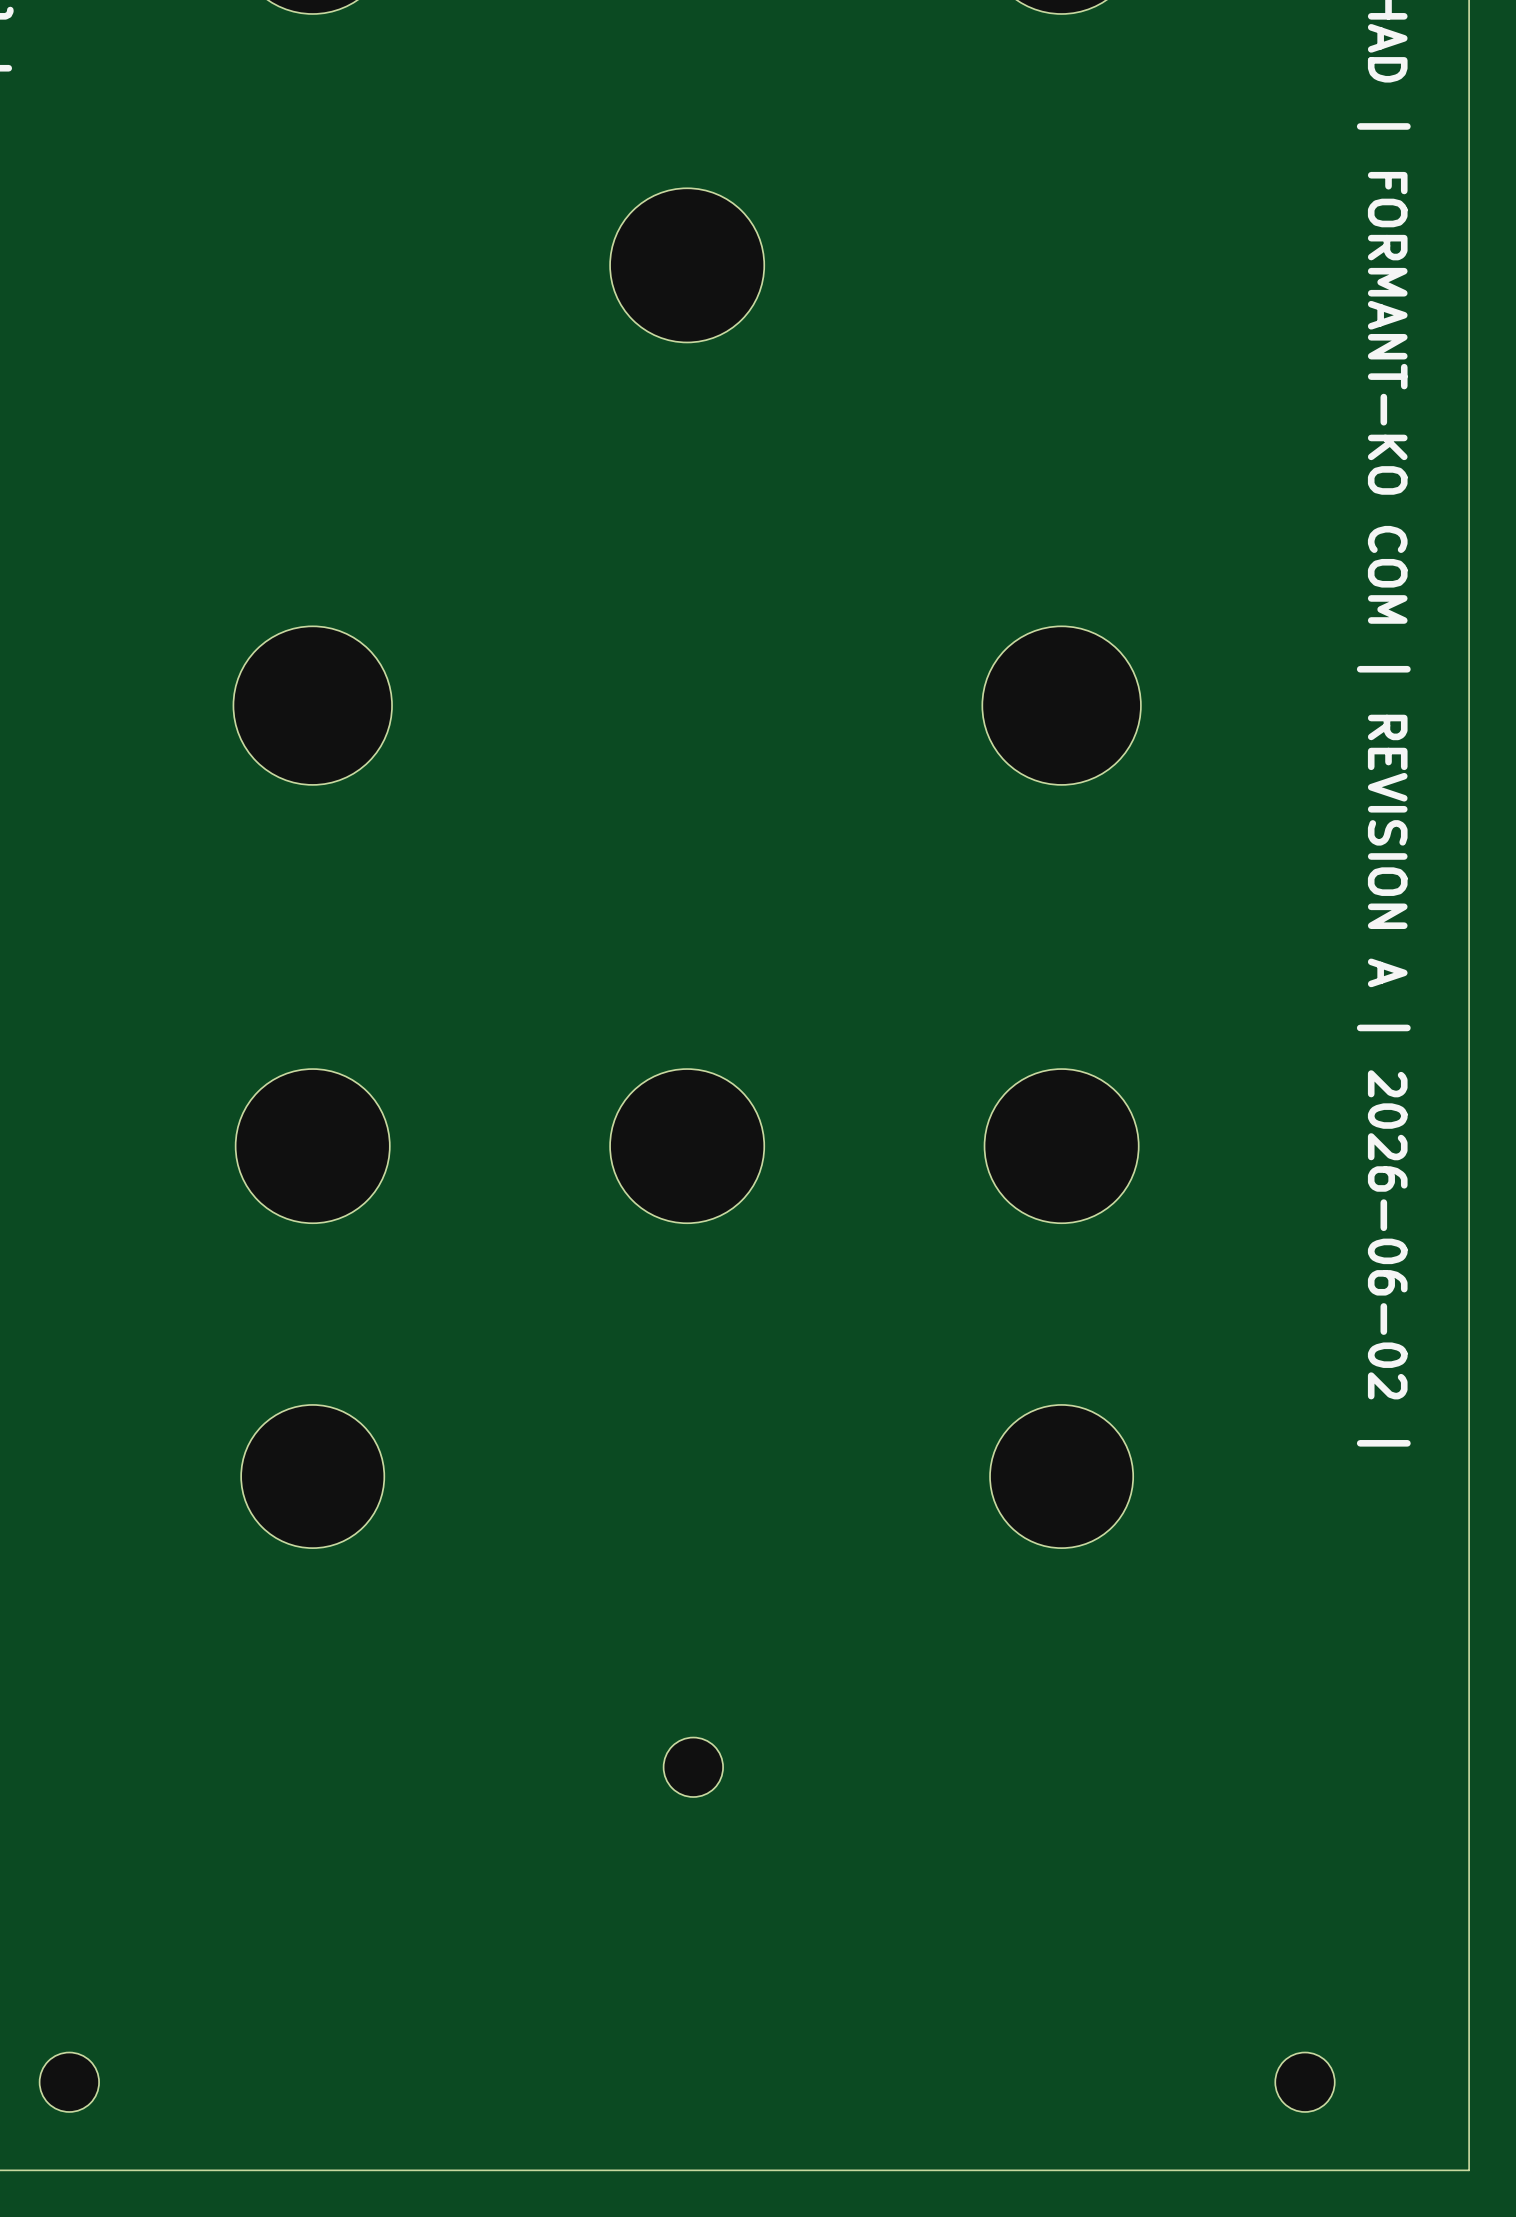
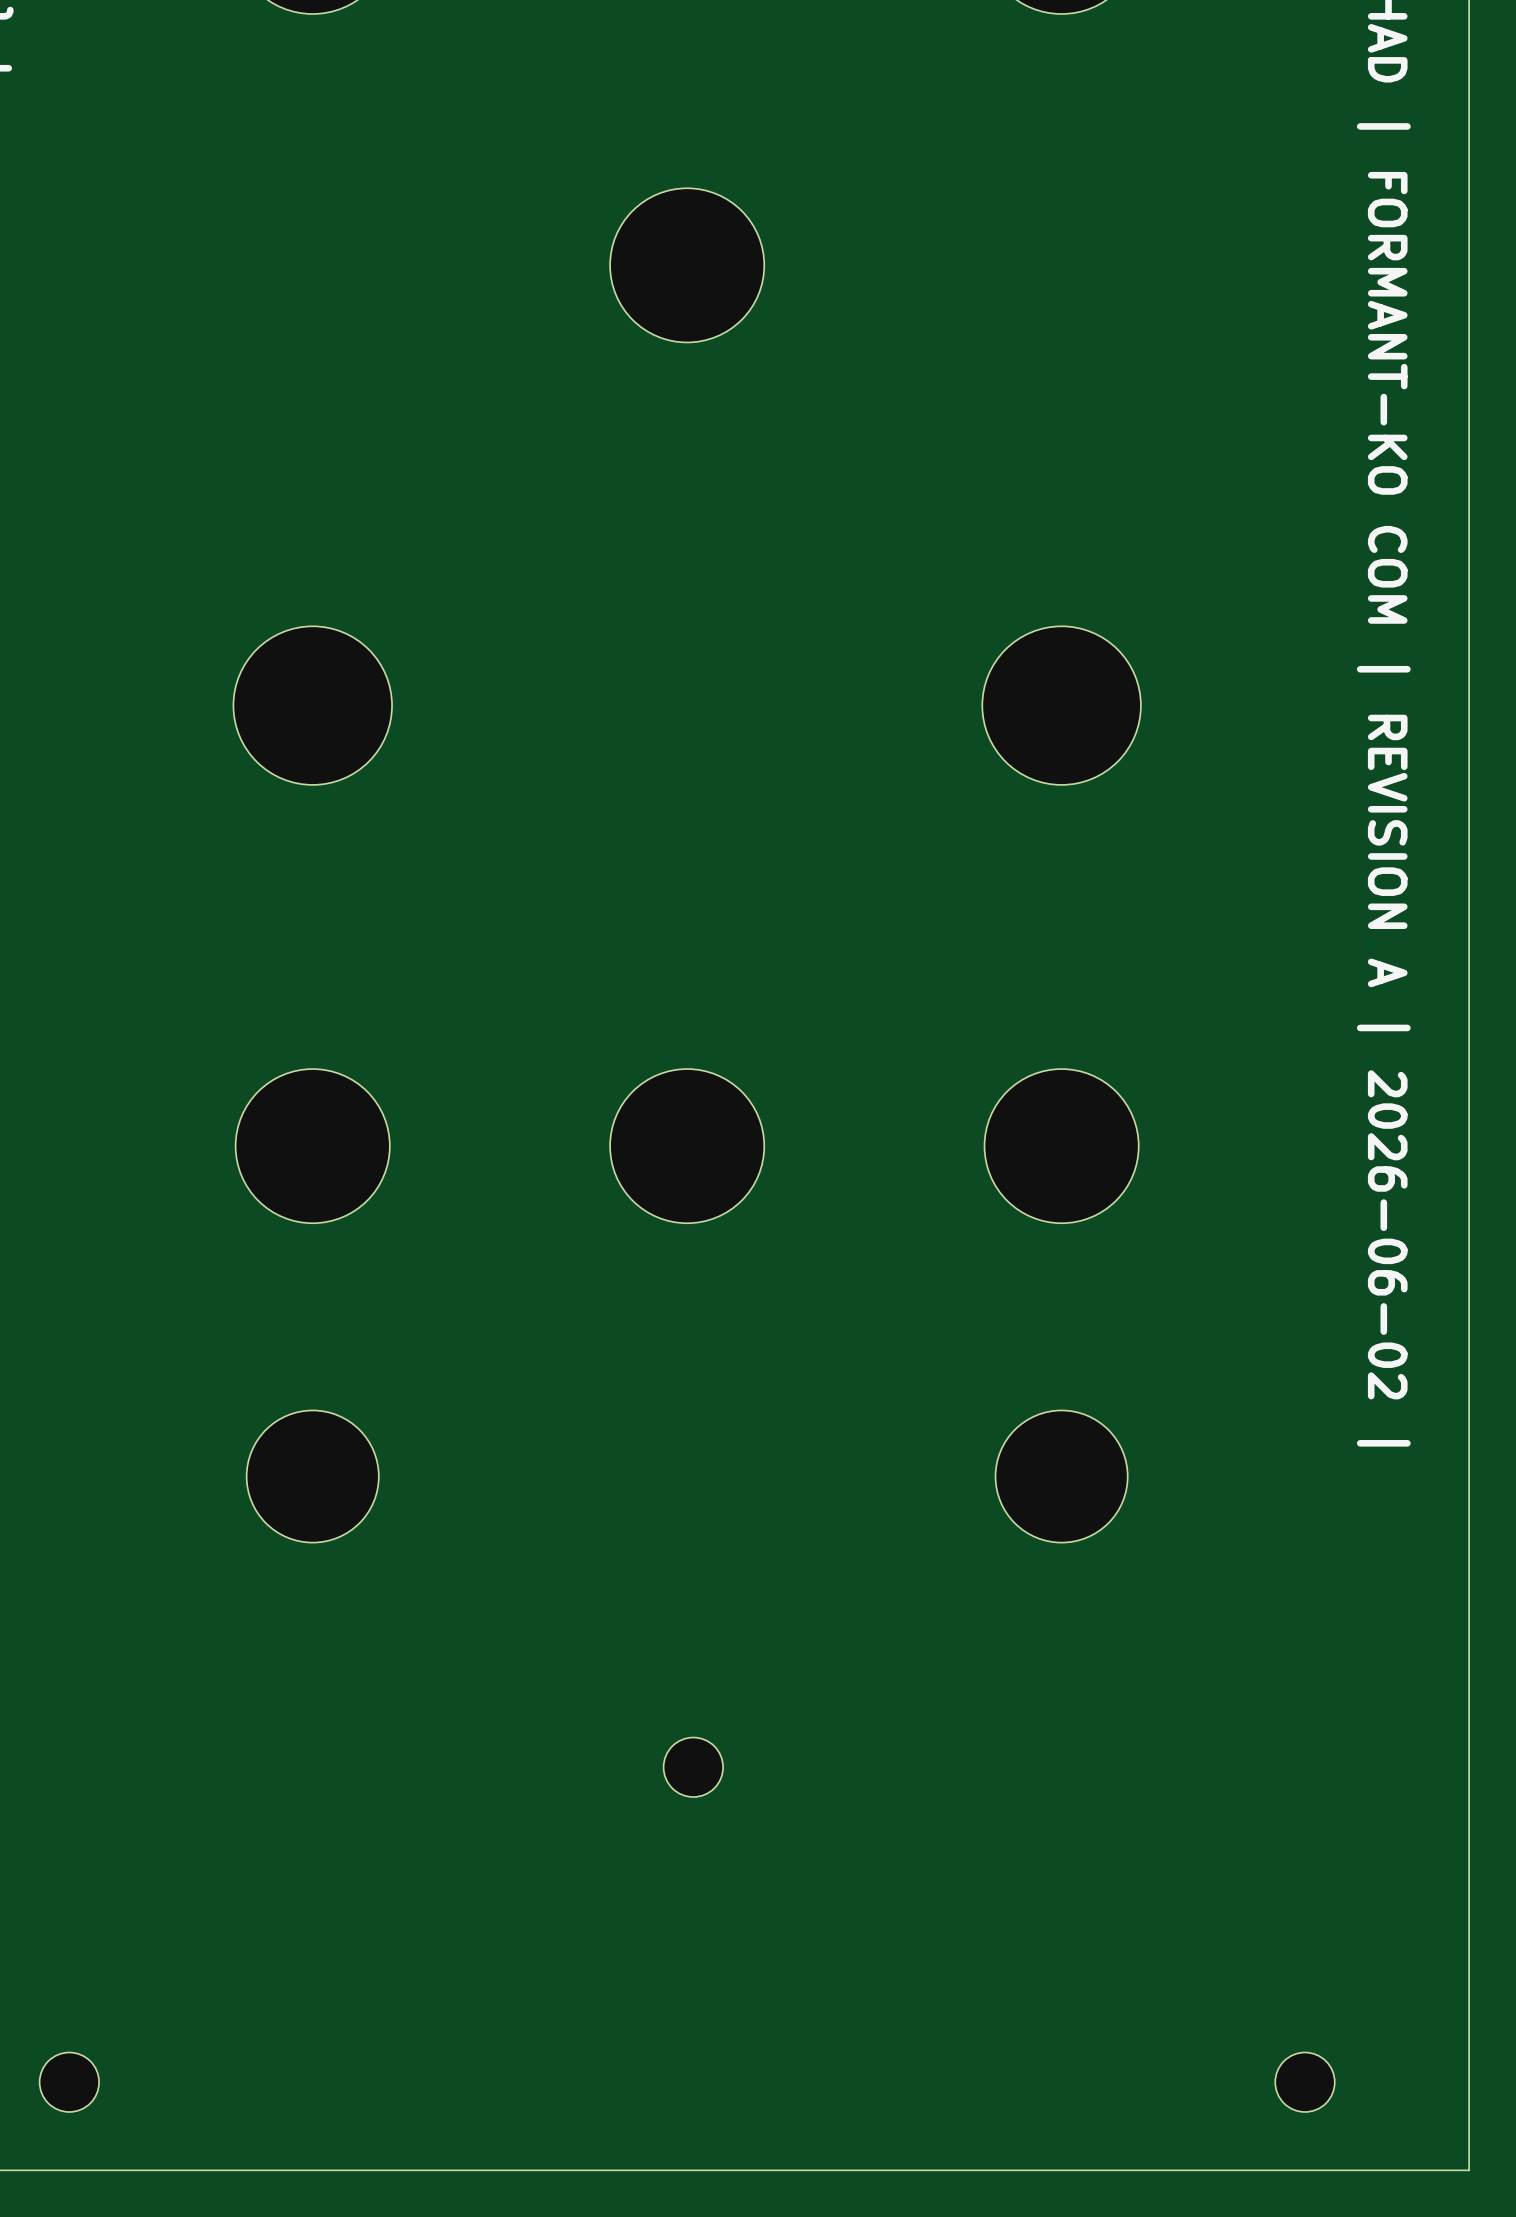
part footprint: [241, 1404, 385, 1549] -> [246, 1410, 379, 1543]
part footprint: [990, 1404, 1134, 1549] -> [995, 1410, 1128, 1543]

